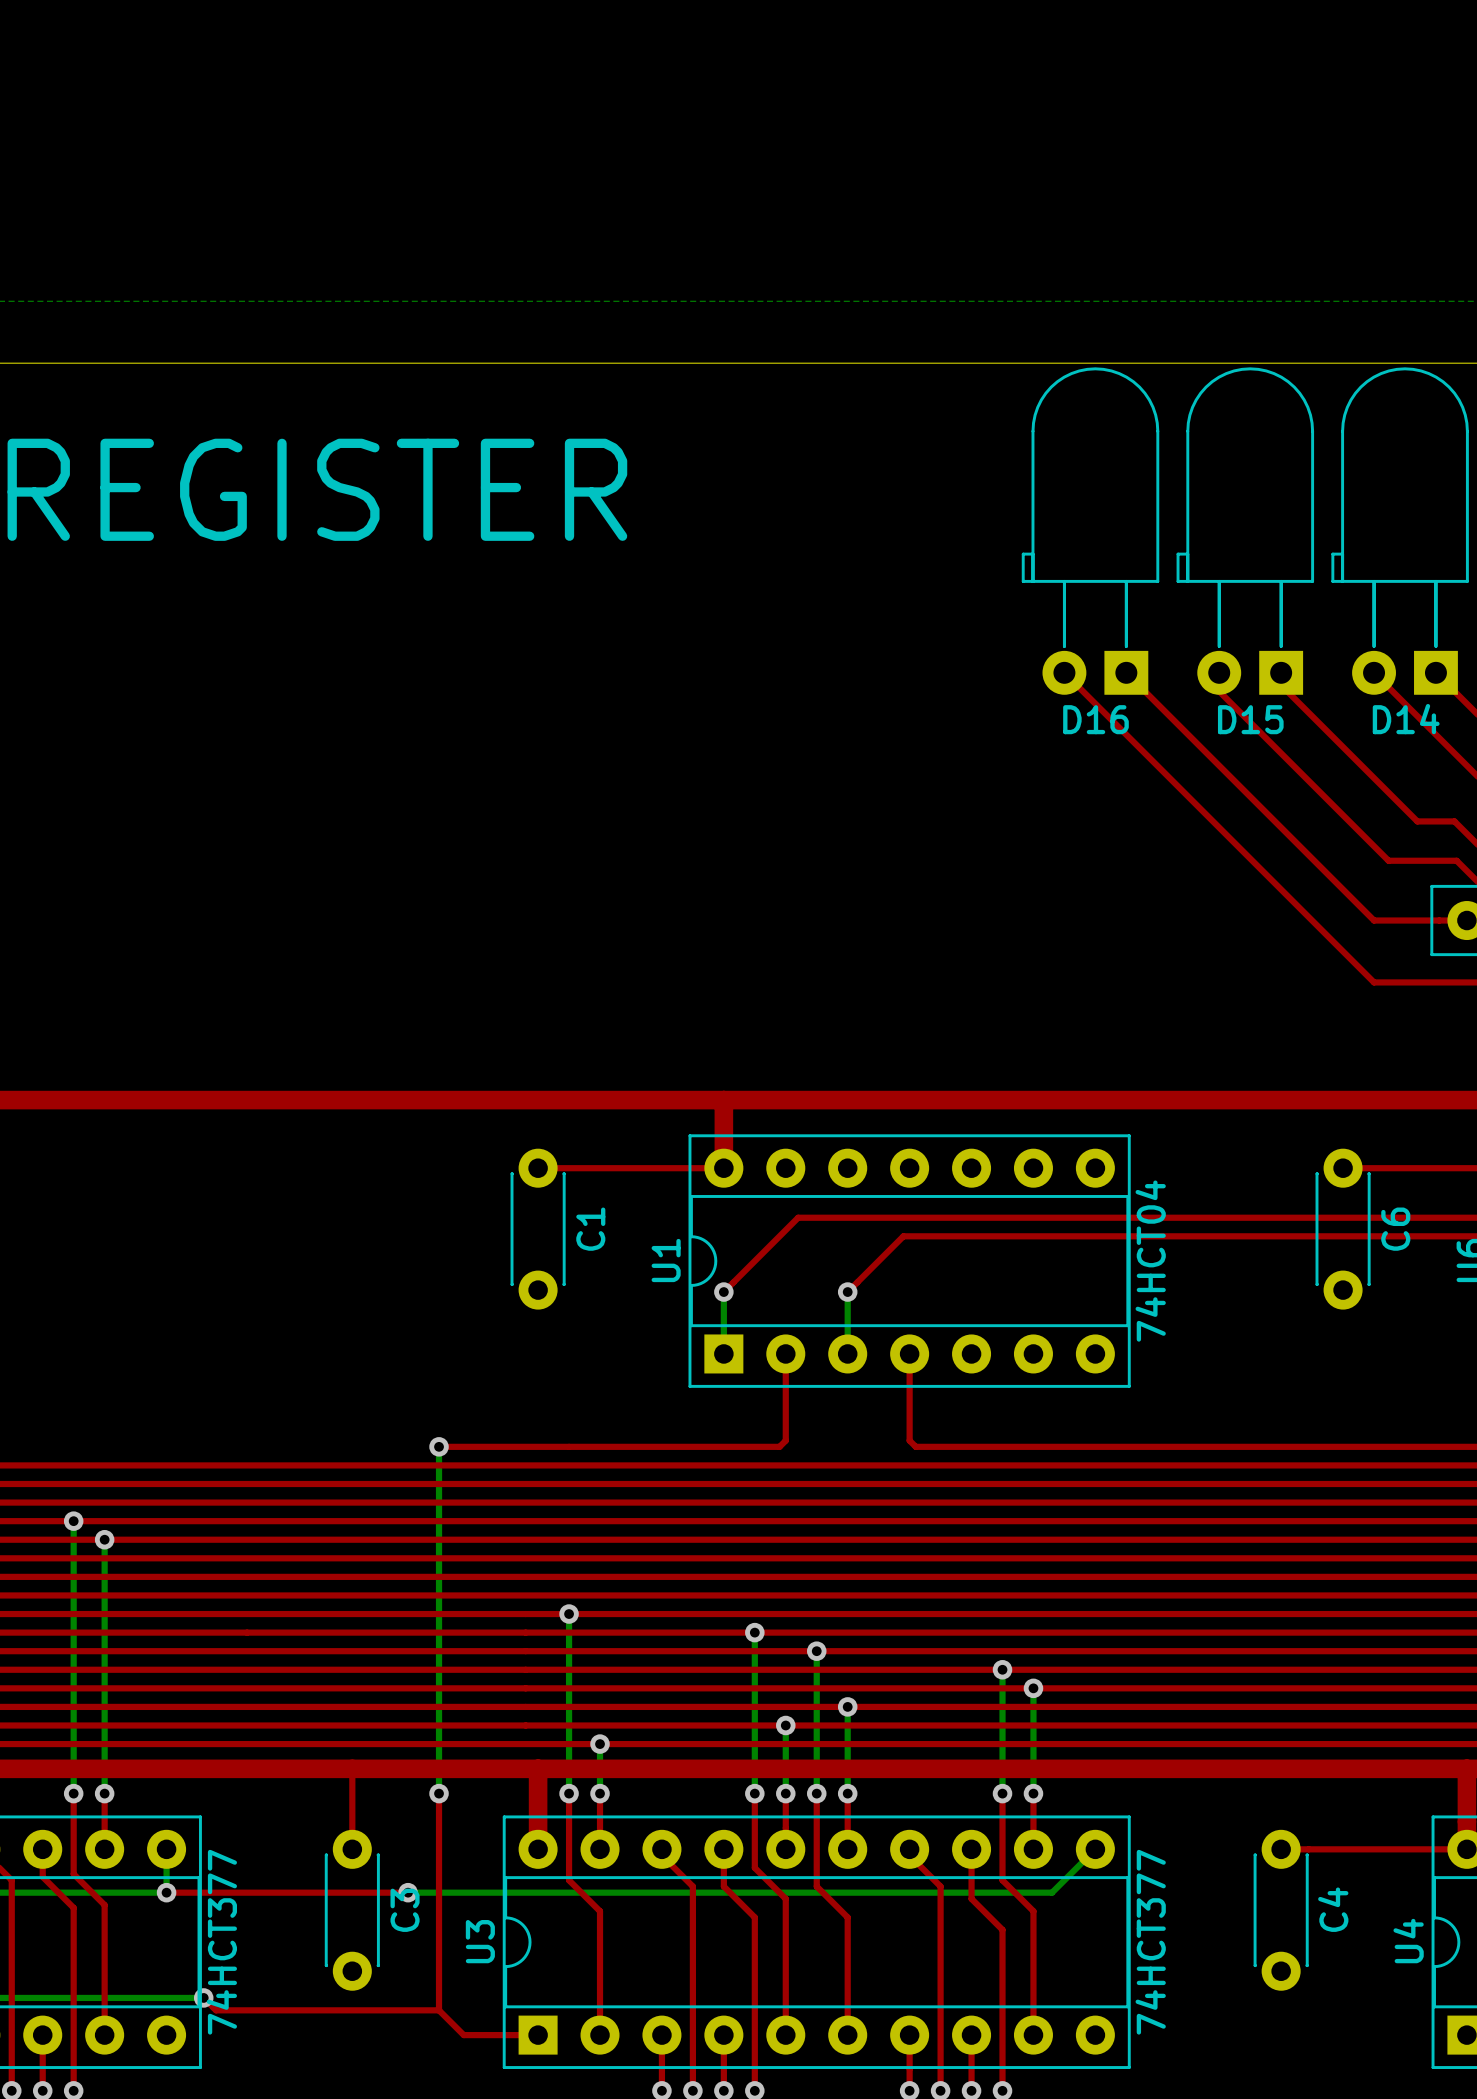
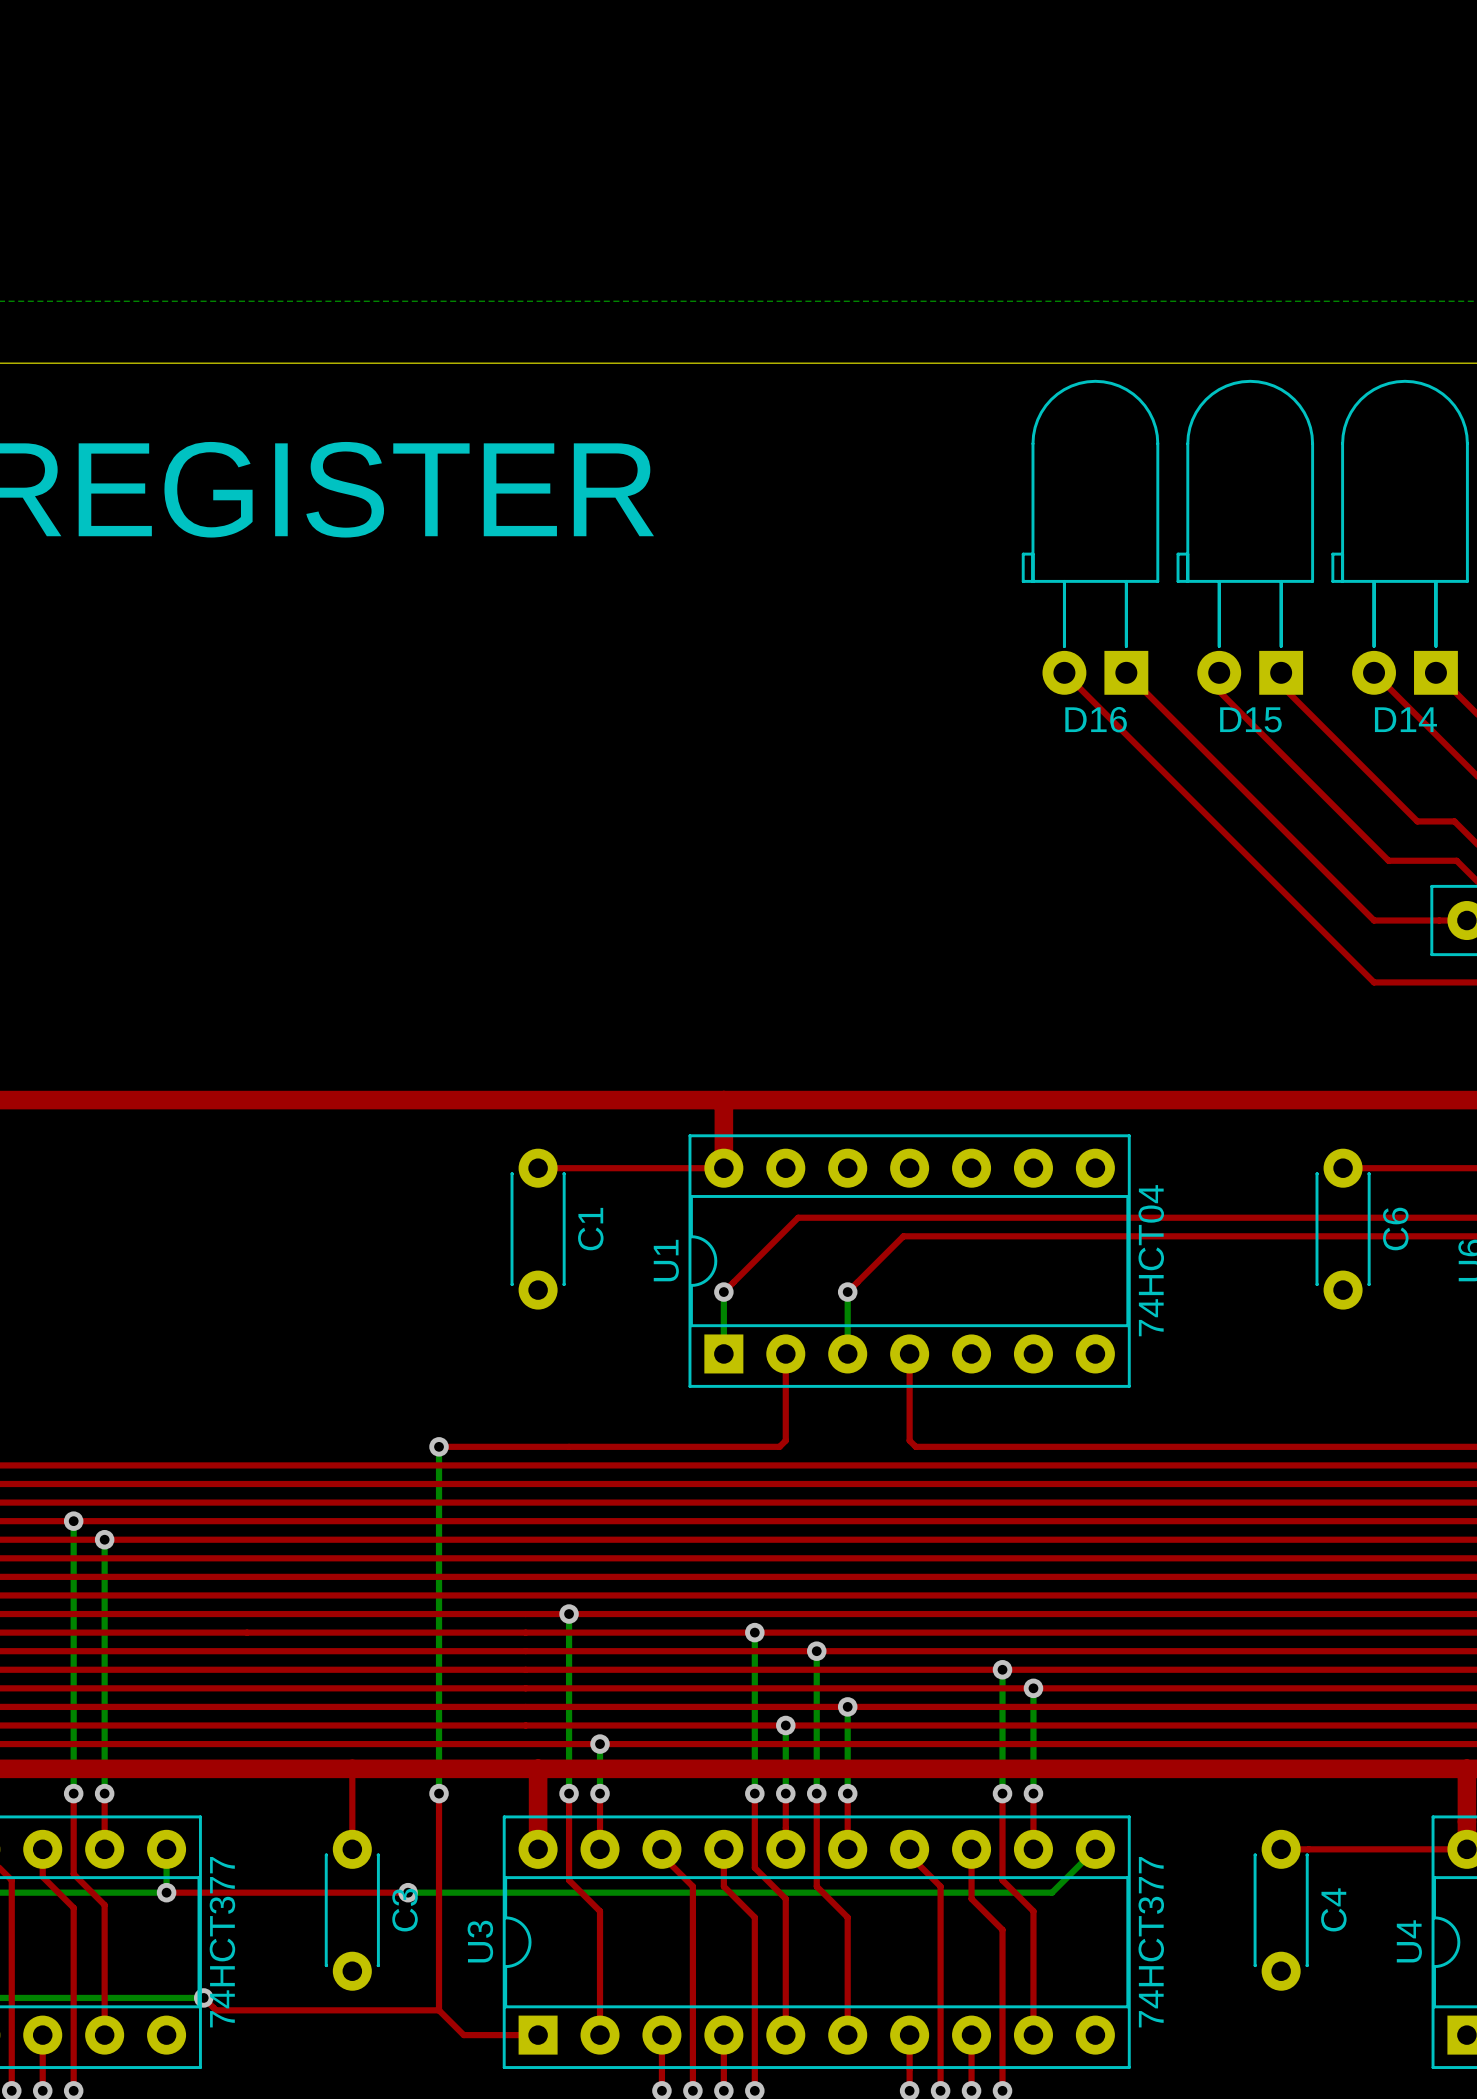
D16 footprint: [1021, 367, 1160, 695] -> [1021, 379, 1160, 695]
D15 footprint: [1176, 367, 1315, 695] -> [1176, 379, 1315, 695]
D14 footprint: [1331, 367, 1469, 695] -> [1331, 379, 1469, 695]

